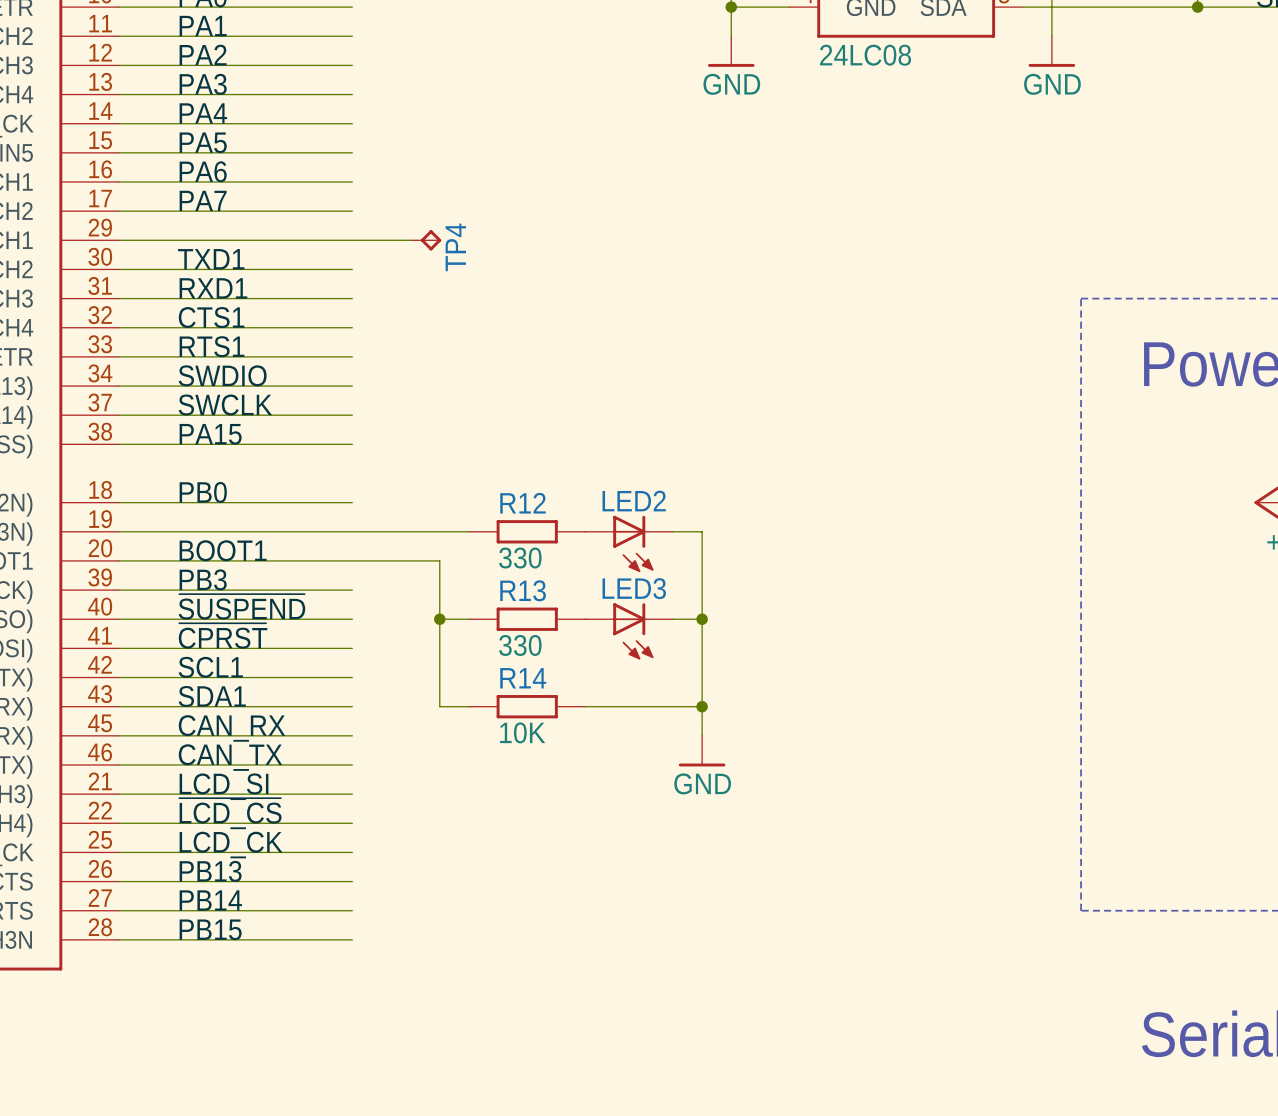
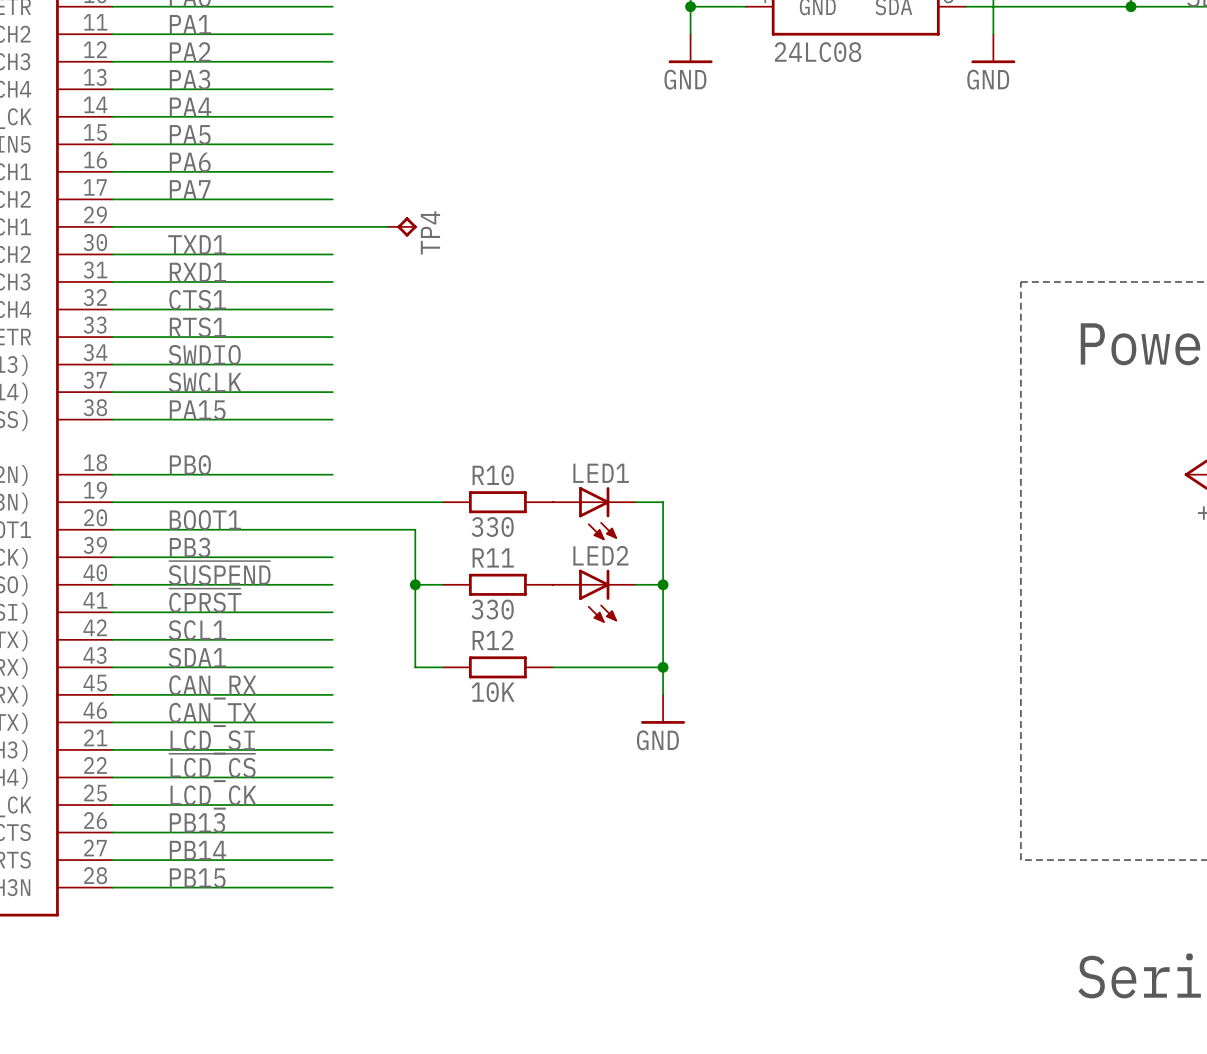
LED2 name: LED2 (634, 501) -> LED1 (601, 473)
R12 name: R12 (522, 503) -> R10 (493, 475)
LED3 name: LED3 (634, 588) -> LED2 (600, 555)
R13 name: R13 (523, 590) -> R11 (493, 557)
R14 name: R14 (523, 678) -> R12 (493, 640)

